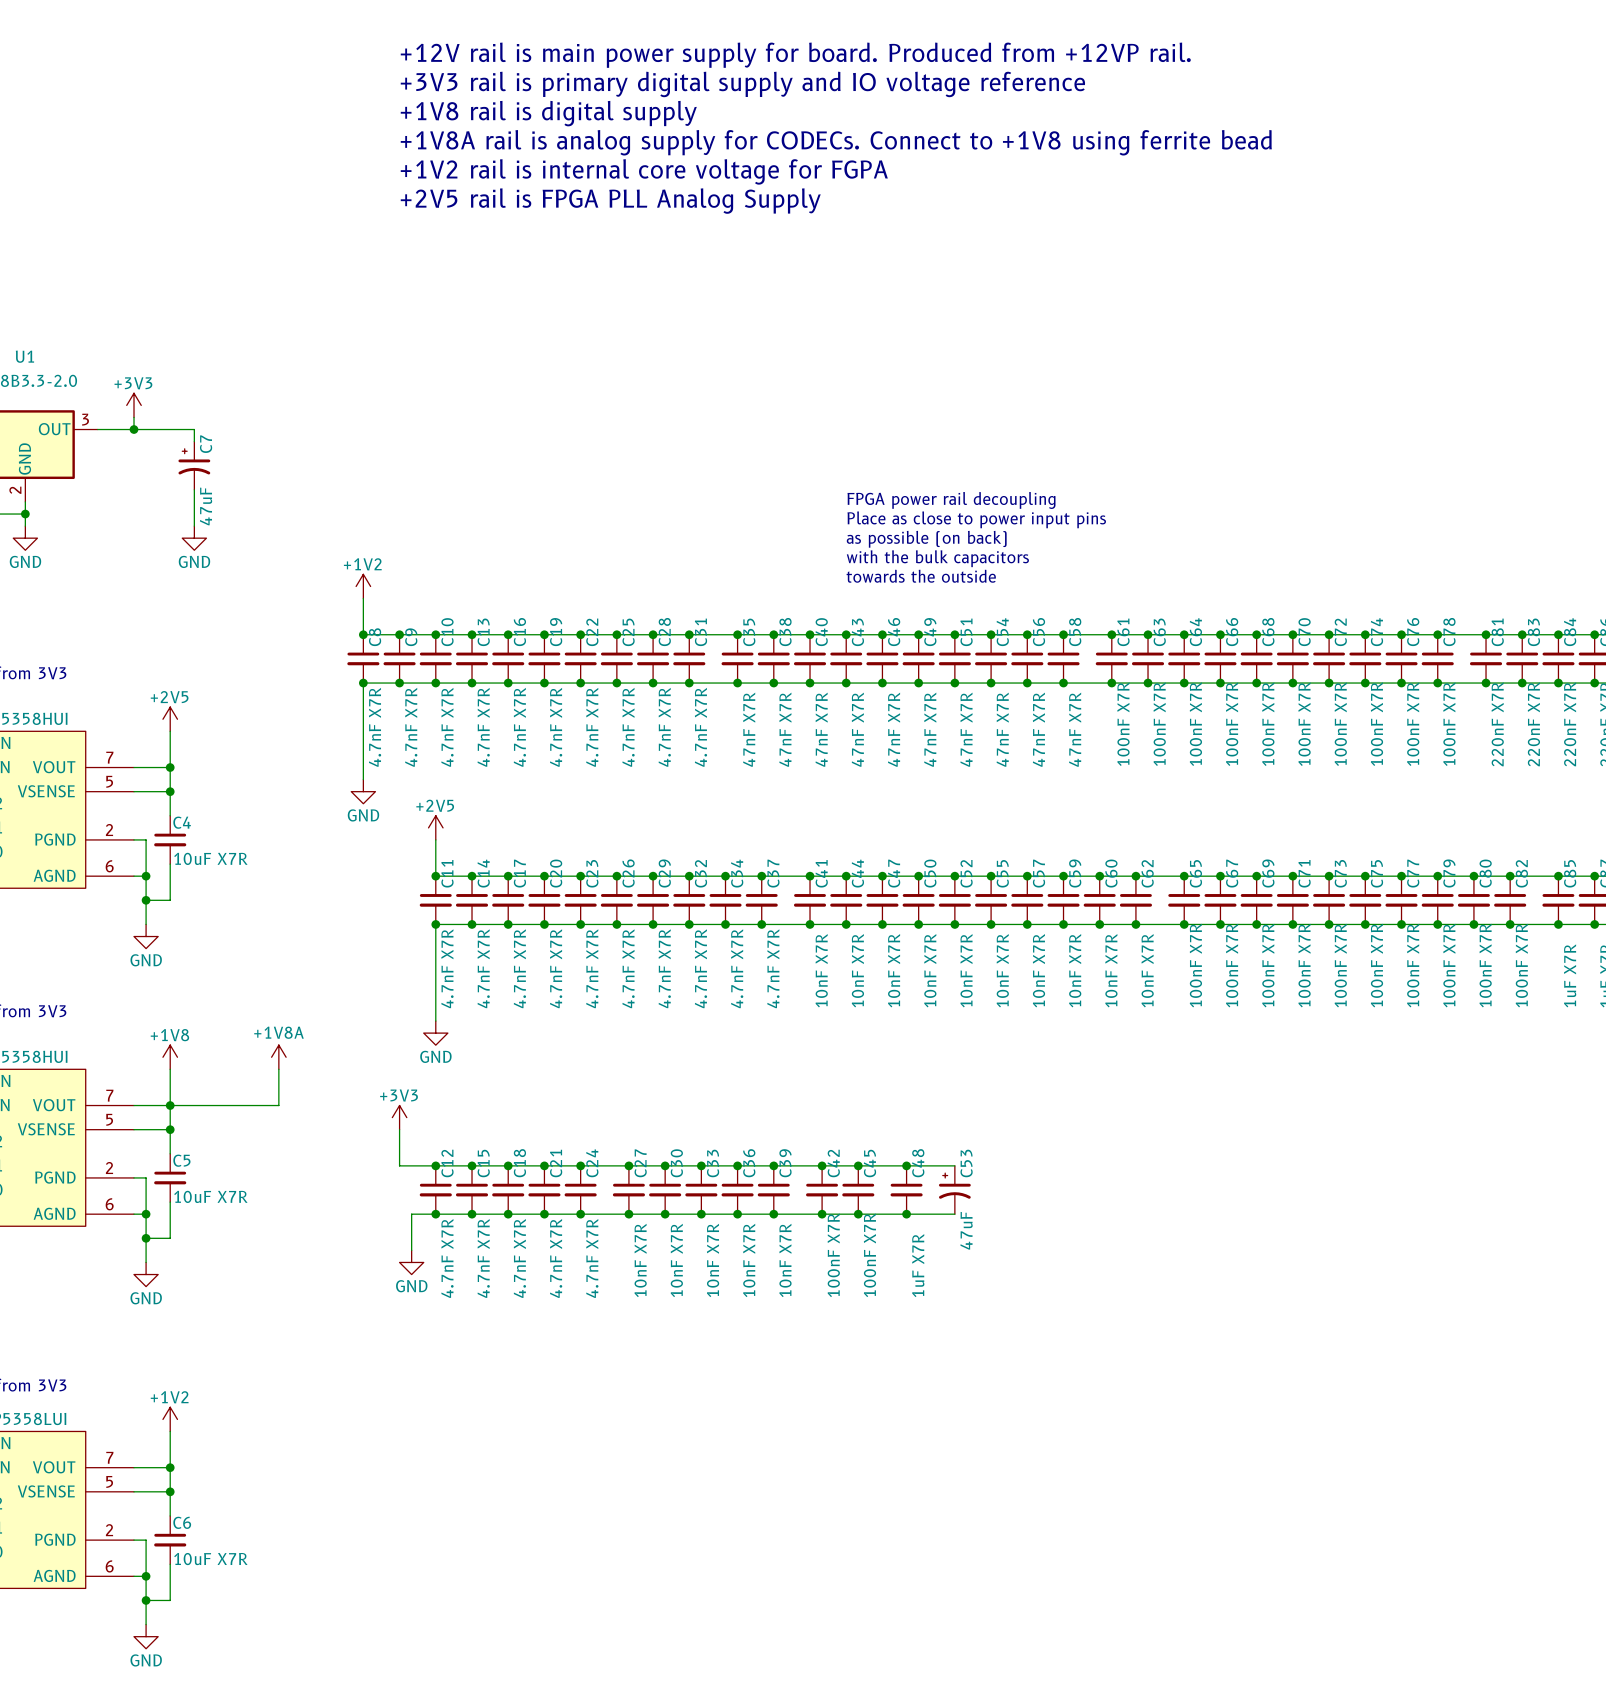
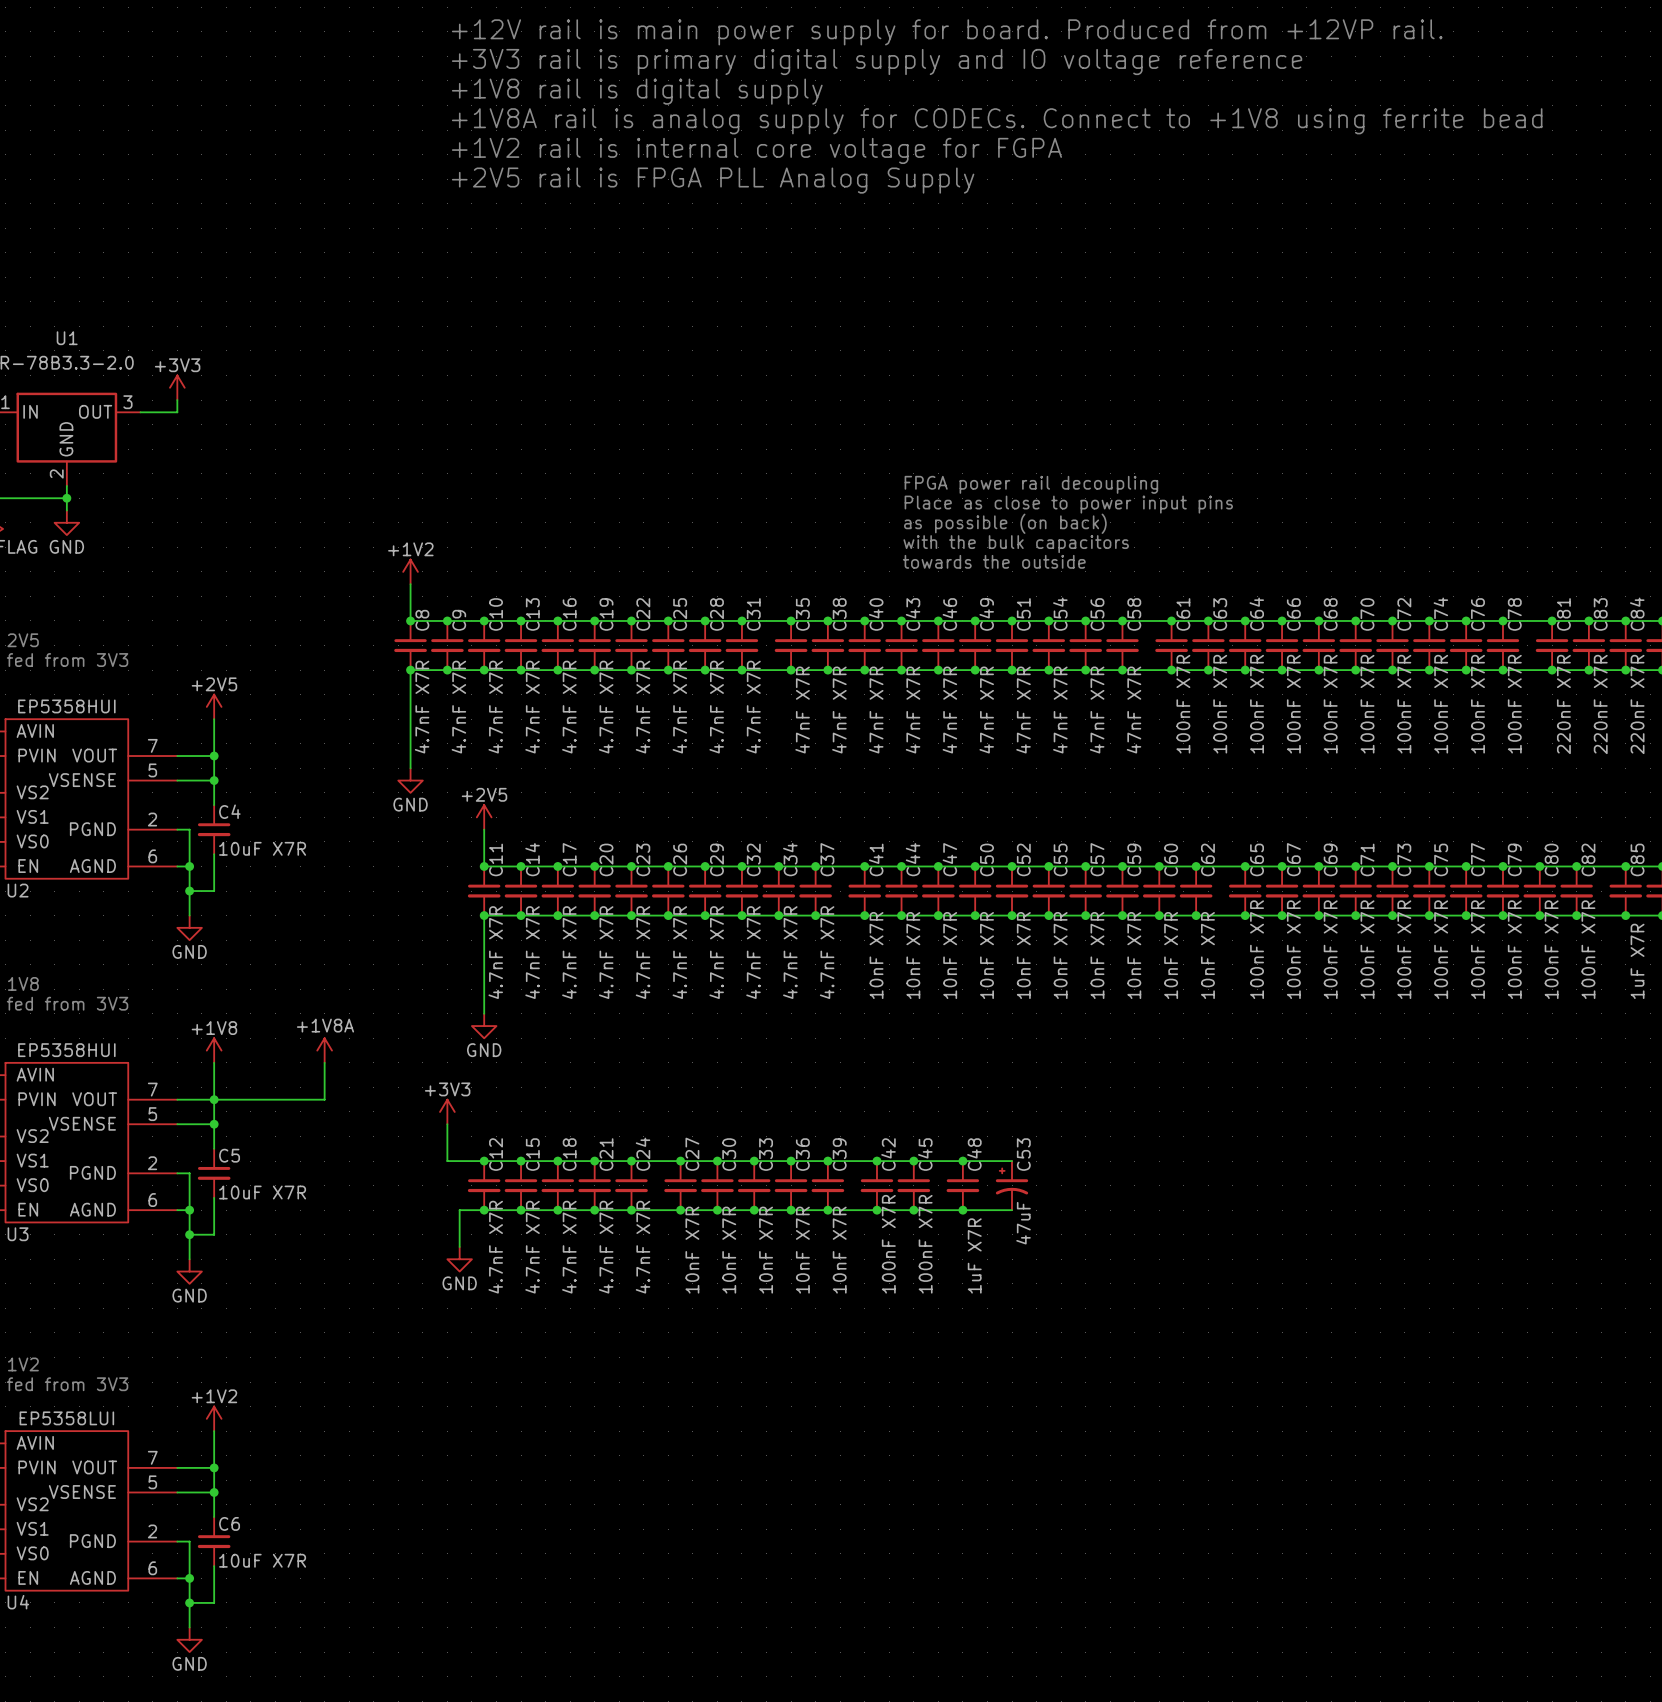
wire: (134, 429) (194, 429) (194, 441) -> none
junction: (134, 429) -> none
C7: 47uF (194, 465) -> none
wire: (194, 489) (194, 526) -> none
power symbol: GND (194, 538) -> none

